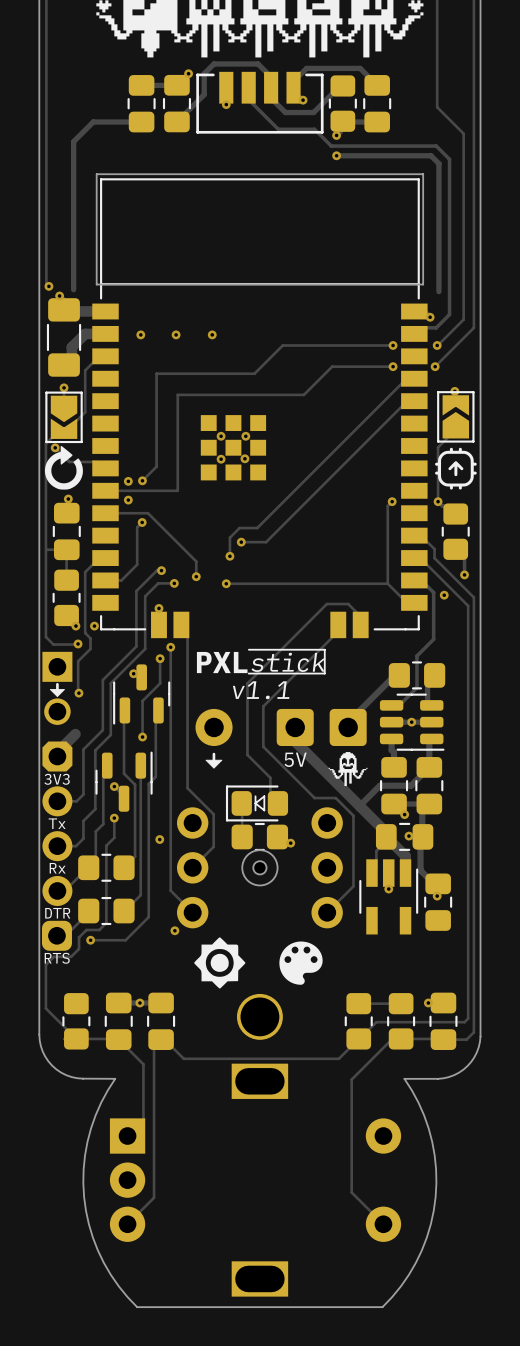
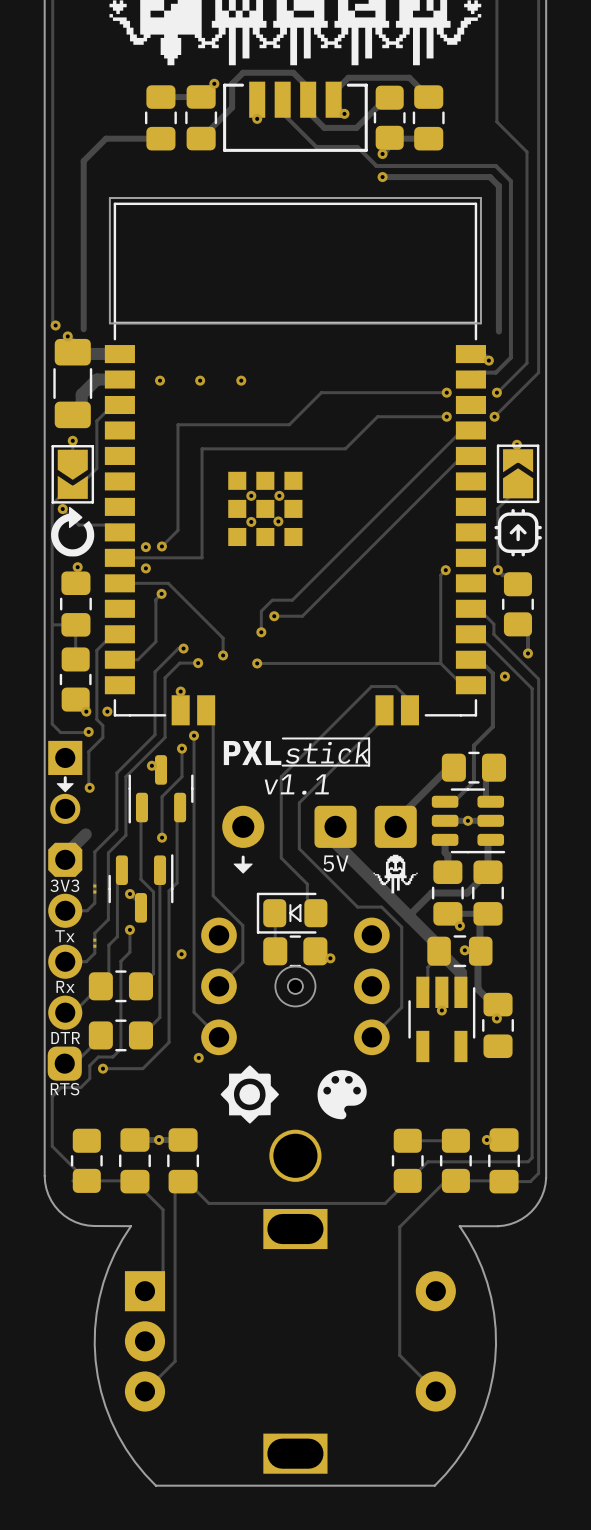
part: none -> (94, 889)
part: none -> (94, 943)

